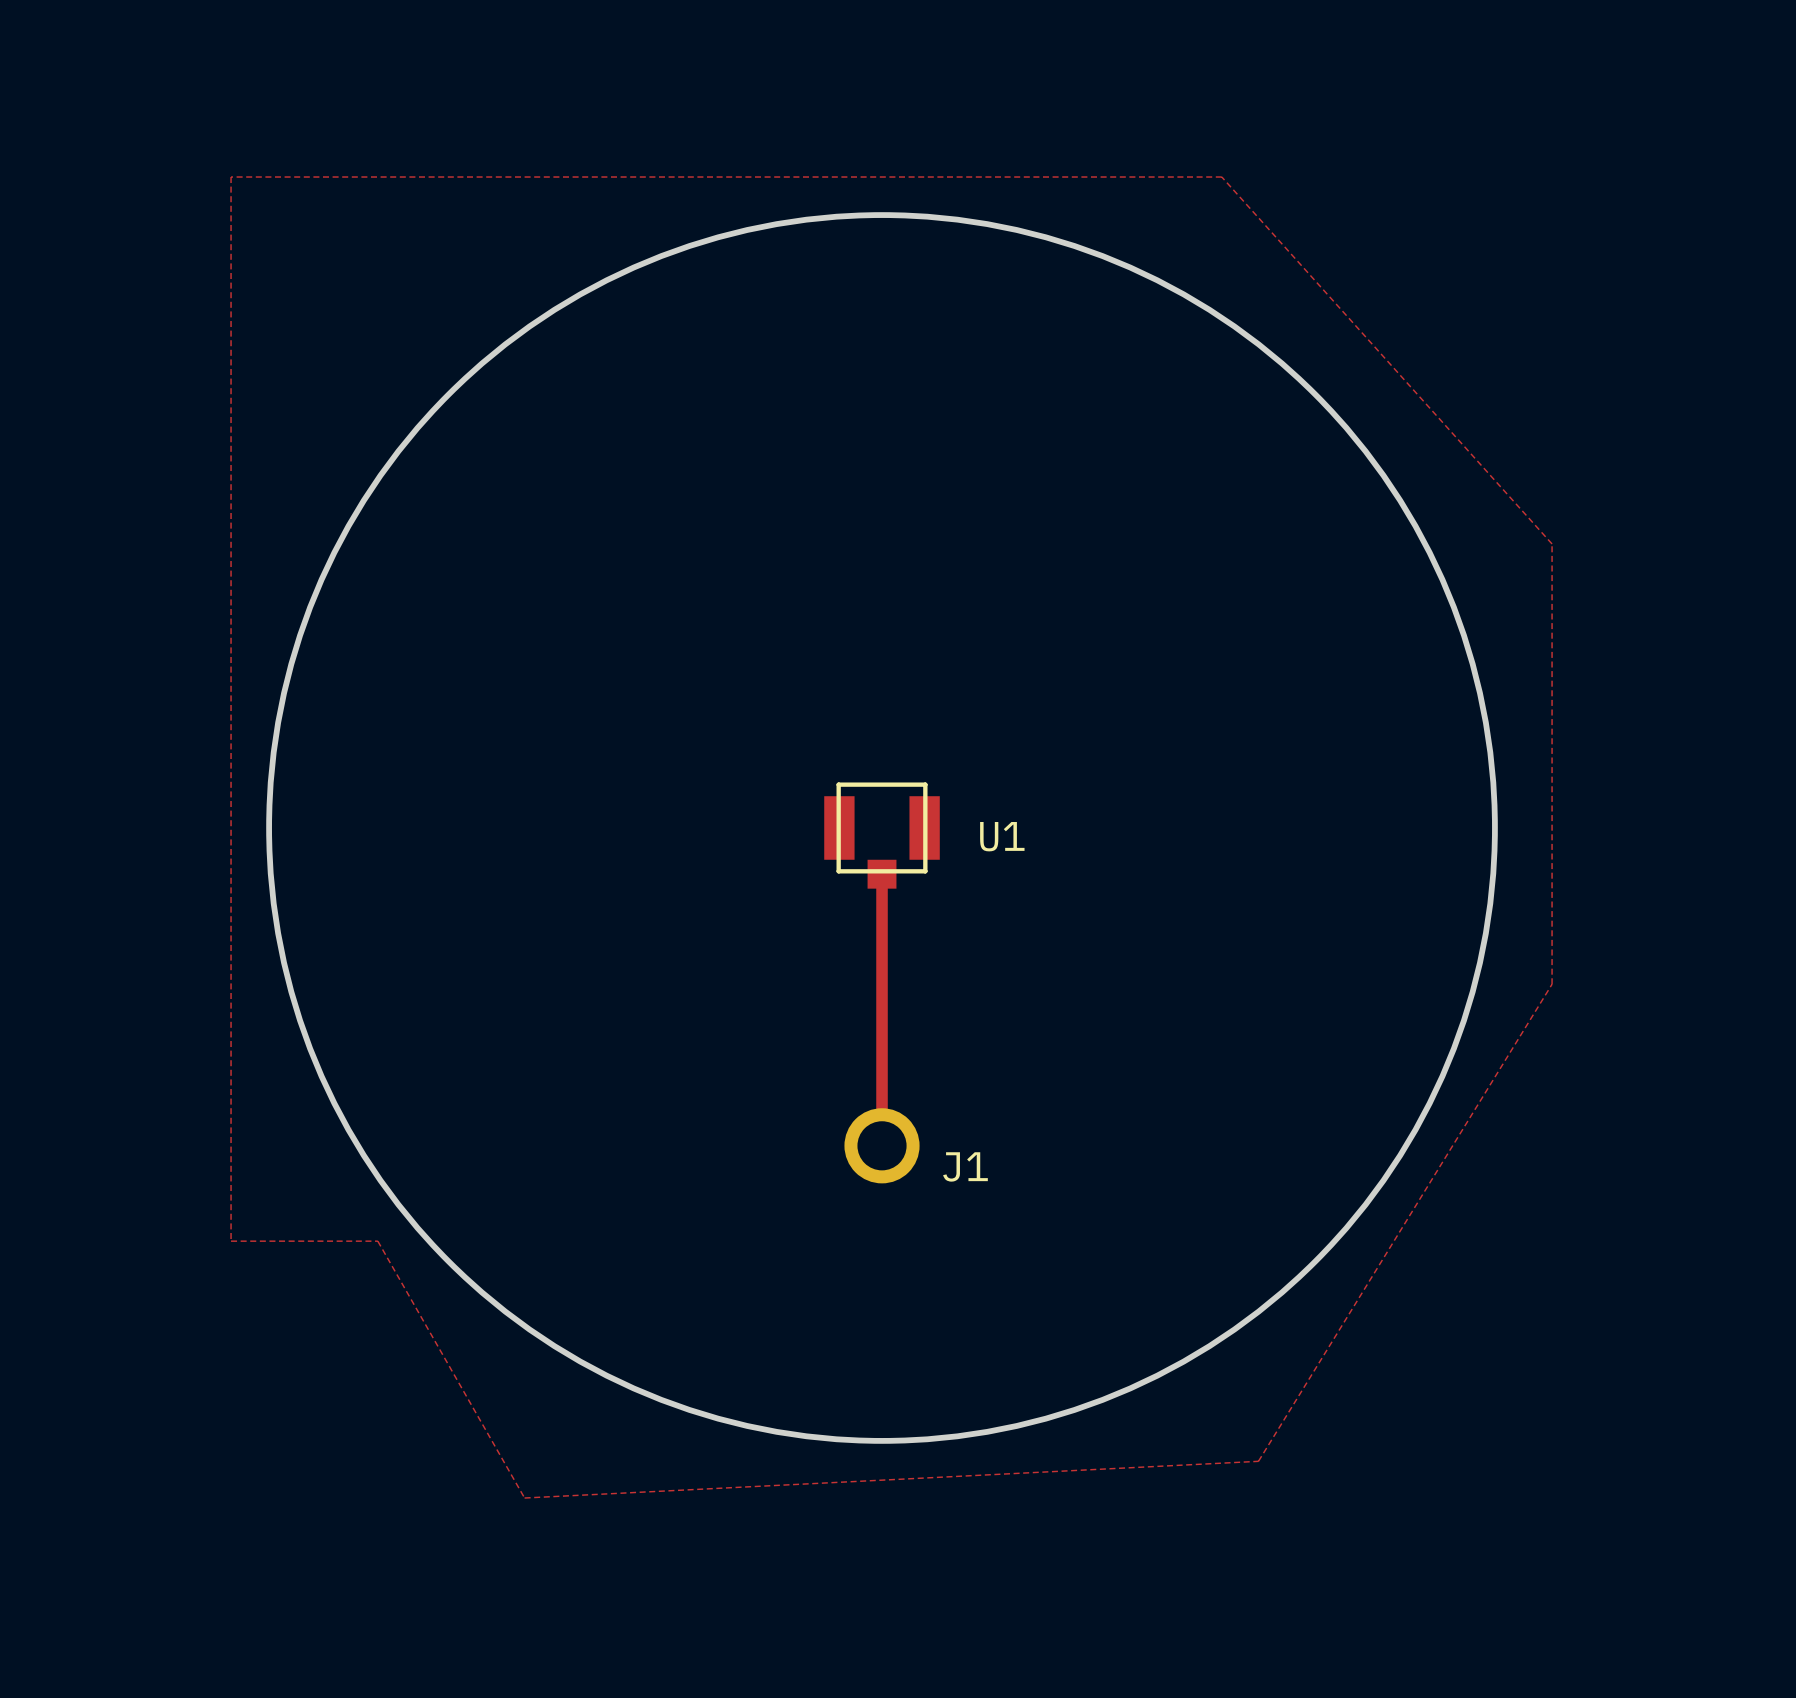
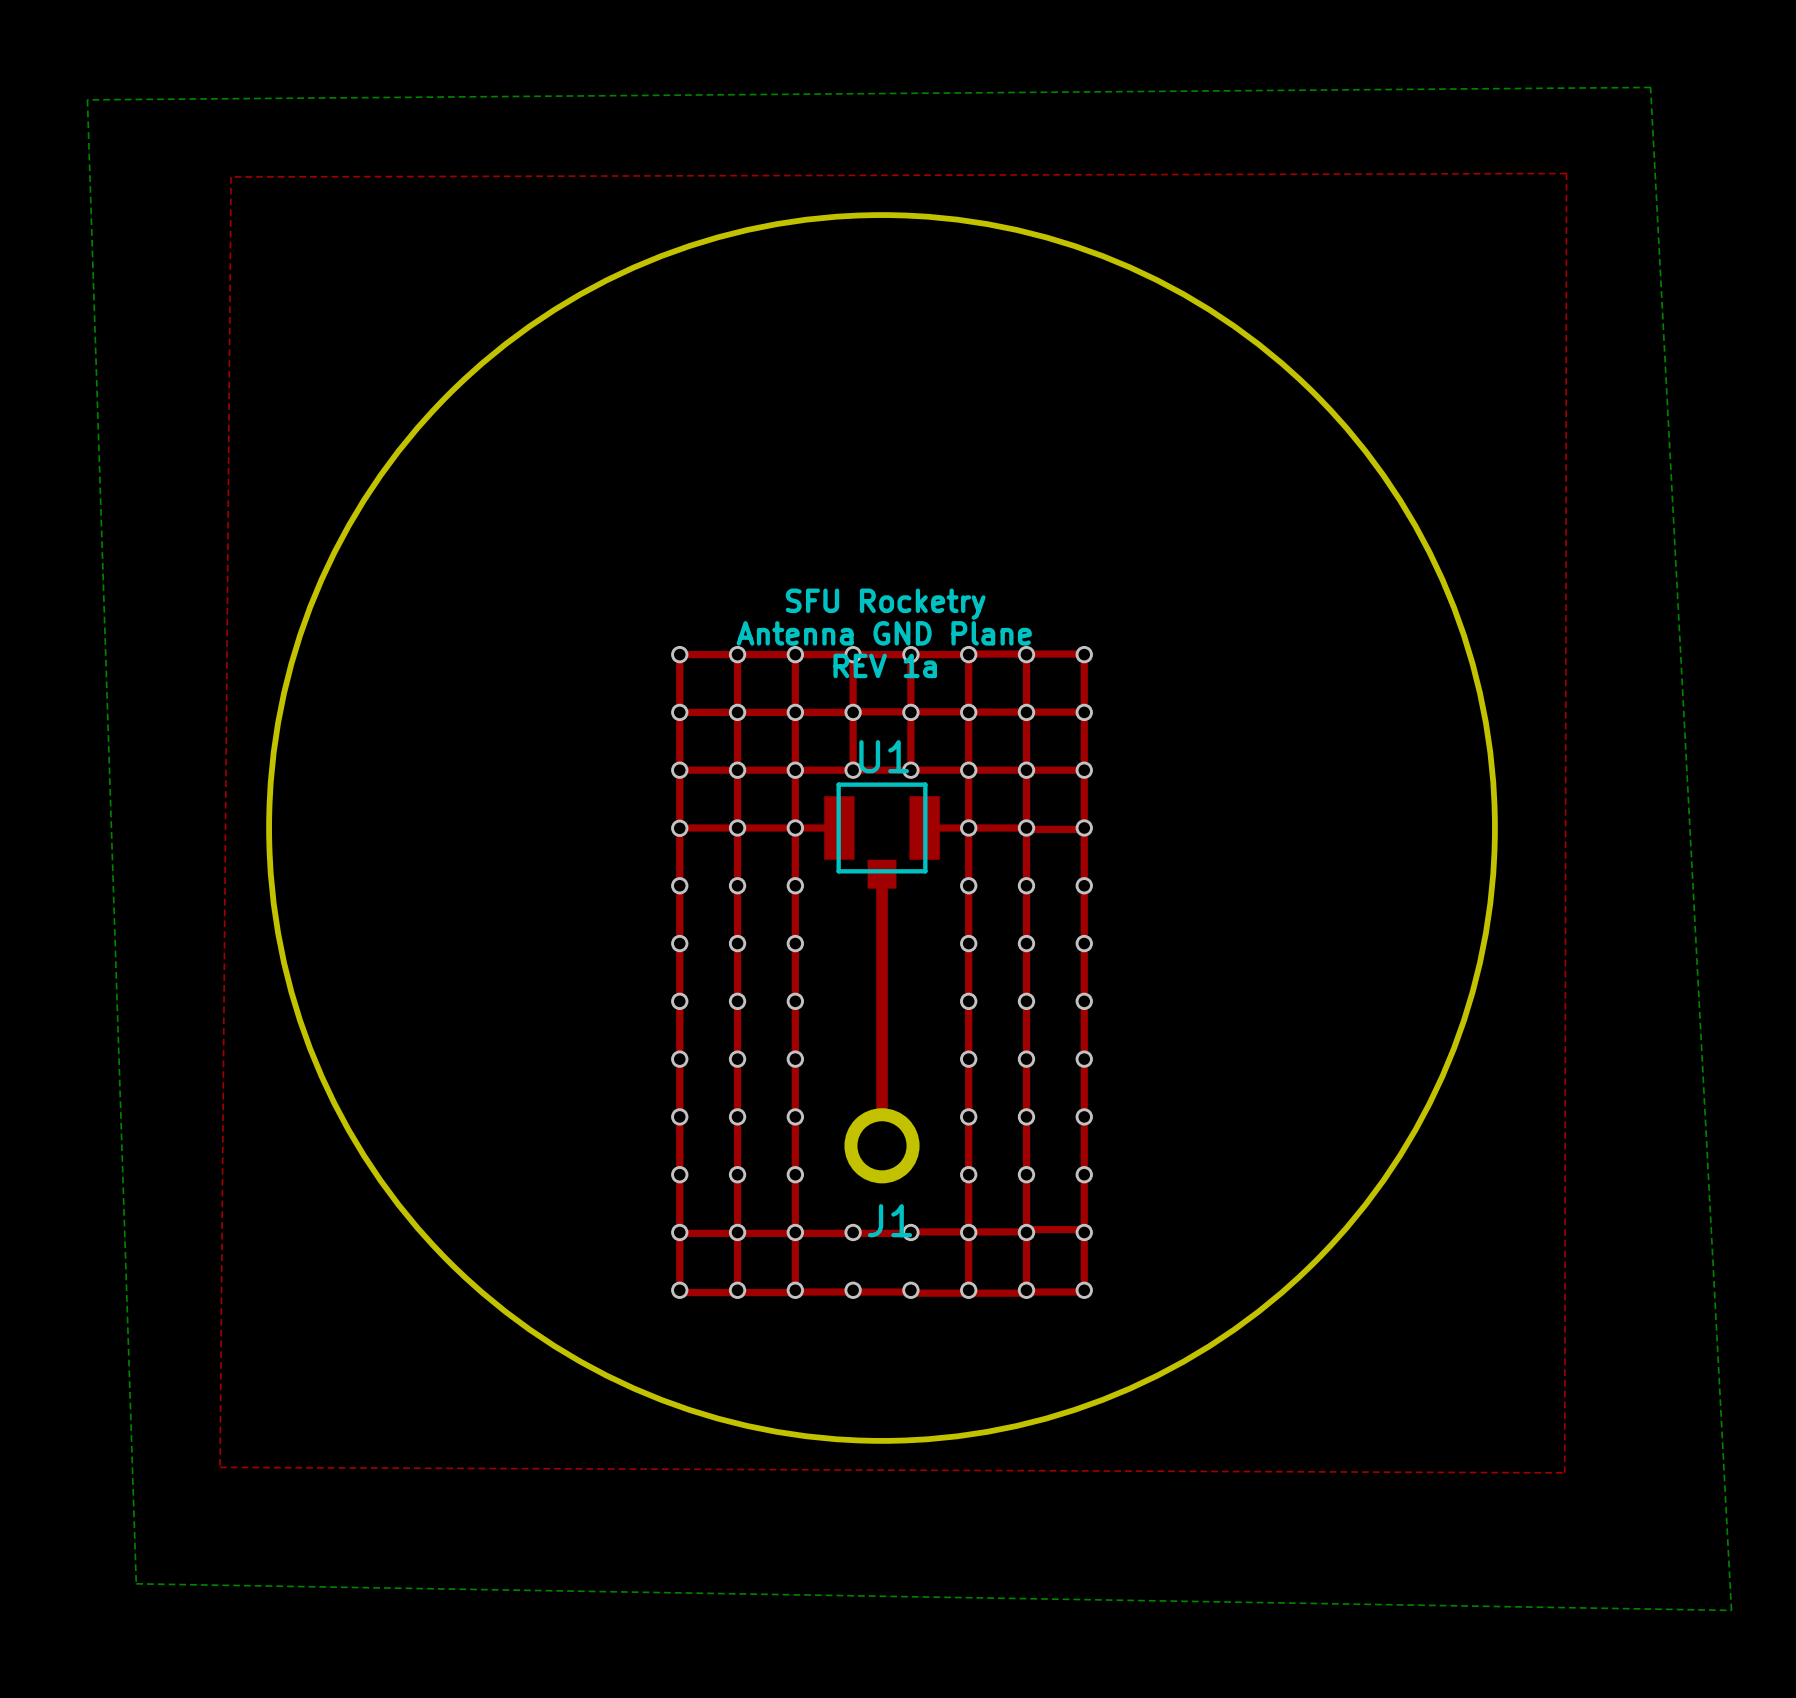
bottom zone outline: none -> (1650, 87) (87, 99) (136, 1583) (1731, 1610) (1650, 87)
top zone outline: (231, 177) (1221, 177) (1552, 543) (1552, 984) (1258, 1461) (524, 1498) (377, 1241) (231, 1241) (231, 177) -> (1566, 173) (231, 177) (220, 1467) (1564, 1472) (1566, 173)
text: none -> SFU Rocketry (885, 604)
text: none -> Antenna GND Plane (884, 633)
top track: none -> (679, 652) (679, 1057)
top track: none -> (853, 653) (679, 654)
via: none -> (679, 654)
top track: none -> (737, 654) (736, 1056)
via: none -> (737, 654)
top track: none -> (795, 654) (795, 1057)
via: none -> (795, 654)
via: none -> (853, 654)
top track: none -> (910, 654) (910, 770)
via: none -> (910, 654)
top track: none -> (968, 654) (968, 770)
via: none -> (968, 654)
top track: none -> (1026, 654) (1027, 884)
via: none -> (1026, 654)
top track: none -> (1084, 654) (1084, 770) (679, 770)
via: none -> (1084, 654)
top track: none -> (1085, 656) (1083, 654) (853, 654) (853, 770)
text: none -> REV 1a (885, 665)
top track: none -> (969, 711) (679, 712)
top track: none -> (1084, 711) (969, 712)
via: none -> (679, 712)
via: none -> (737, 712)
via: none -> (795, 712)
via: none -> (853, 712)
via: none -> (910, 712)
via: none -> (968, 712)
via: none -> (1026, 712)
via: none -> (1084, 712)
via: none -> (679, 770)
via: none -> (737, 770)
via: none -> (795, 770)
via: none -> (853, 770)
via: none -> (910, 770)
via: none -> (968, 770)
via: none -> (1026, 770)
via: none -> (1084, 770)
top track: none -> (968, 771) (968, 885)
top track: none -> (1084, 773) (1084, 884)
top track: none -> (969, 826) (924, 827)
top track: none -> (679, 827) (795, 827)
via: none -> (737, 827)
top track: none -> (795, 827) (839, 827)
via: none -> (795, 827)
via: none -> (968, 827)
via: none -> (1026, 827)
top track: none -> (1083, 827) (1081, 829) (968, 827)
via: none -> (1084, 827)
via: none -> (679, 828)
U1 name position: U1 (1002, 836) -> U1 (884, 756)
via: none -> (679, 885)
via: none -> (737, 885)
via: none -> (795, 885)
top track: none -> (968, 885) (968, 940)
via: none -> (968, 885)
top track: none -> (1026, 885) (1025, 940)
via: none -> (1026, 885)
top track: none -> (1084, 885) (1085, 941)
via: none -> (1084, 885)
via: none -> (679, 943)
via: none -> (737, 943)
via: none -> (795, 943)
top track: none -> (968, 943) (969, 997)
via: none -> (968, 943)
top track: none -> (1026, 943) (1027, 997)
via: none -> (1026, 943)
top track: none -> (1084, 943) (1083, 995)
via: none -> (1084, 943)
via: none -> (679, 1001)
via: none -> (737, 1001)
via: none -> (795, 1001)
top track: none -> (968, 1001) (968, 1054)
via: none -> (968, 1001)
top track: none -> (1026, 1001) (1025, 1055)
via: none -> (1026, 1001)
top track: none -> (1084, 1001) (1084, 1051)
via: none -> (1084, 1001)
top track: none -> (679, 1059) (678, 1293)
via: none -> (679, 1059)
top track: none -> (737, 1059) (737, 1290)
via: none -> (737, 1059)
top track: none -> (795, 1059) (795, 1290)
via: none -> (795, 1059)
top track: none -> (968, 1059) (968, 1116)
via: none -> (968, 1059)
top track: none -> (1026, 1059) (1026, 1113)
via: none -> (1026, 1059)
top track: none -> (1084, 1059) (1083, 1114)
via: none -> (1084, 1059)
via: none -> (679, 1116)
via: none -> (737, 1116)
via: none -> (795, 1116)
top track: none -> (968, 1116) (968, 1174)
via: none -> (968, 1116)
top track: none -> (1026, 1116) (1026, 1290)
via: none -> (1026, 1116)
top track: none -> (1084, 1116) (1083, 1174)
via: none -> (1084, 1116)
J1 name position: J1 (965, 1166) -> J1 (889, 1220)
via: none -> (679, 1174)
via: none -> (737, 1174)
via: none -> (795, 1174)
top track: none -> (968, 1174) (968, 1290)
via: none -> (968, 1174)
via: none -> (1026, 1174)
top track: none -> (1084, 1174) (1084, 1290)
via: none -> (1084, 1174)
top track: none -> (1083, 1229) (1028, 1229) (1026, 1231) (795, 1233)
top track: none -> (679, 1232) (794, 1233)
via: none -> (679, 1232)
via: none -> (737, 1232)
via: none -> (795, 1232)
via: none -> (853, 1232)
via: none -> (910, 1232)
via: none -> (968, 1232)
via: none -> (1026, 1232)
via: none -> (1084, 1232)
via: none -> (679, 1290)
via: none -> (737, 1290)
via: none -> (795, 1290)
via: none -> (853, 1290)
via: none -> (910, 1290)
via: none -> (968, 1290)
via: none -> (1026, 1290)
via: none -> (1084, 1290)
top track: none -> (1084, 1292) (679, 1292)

